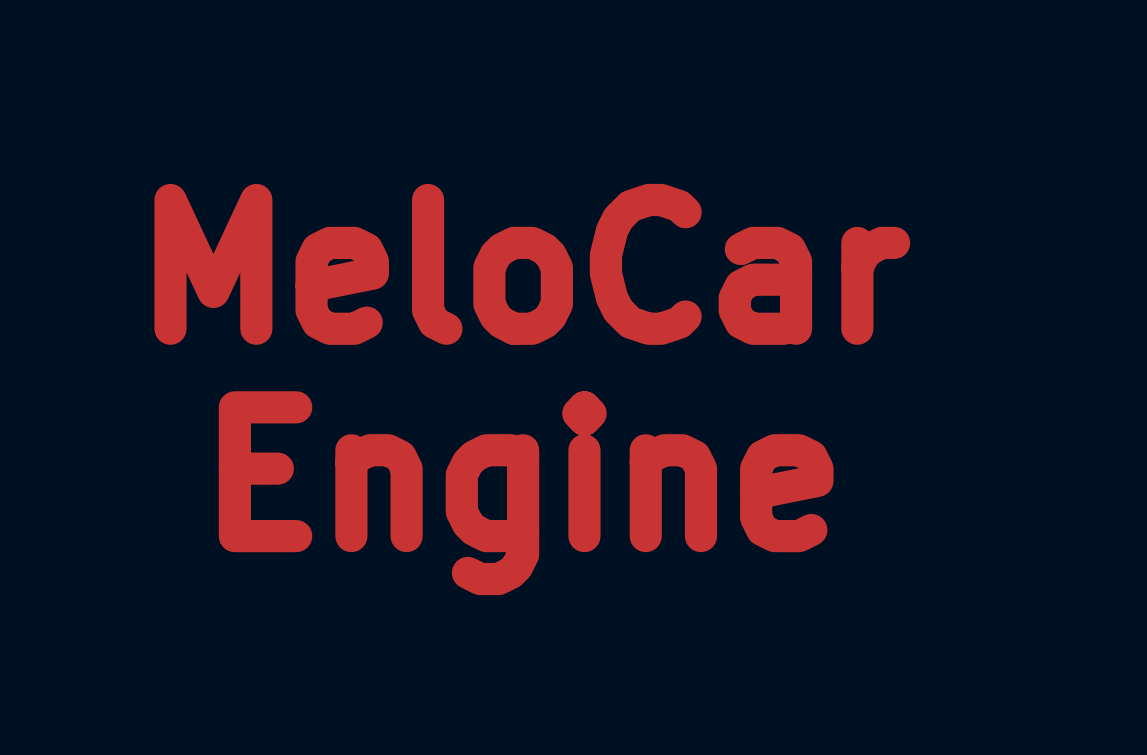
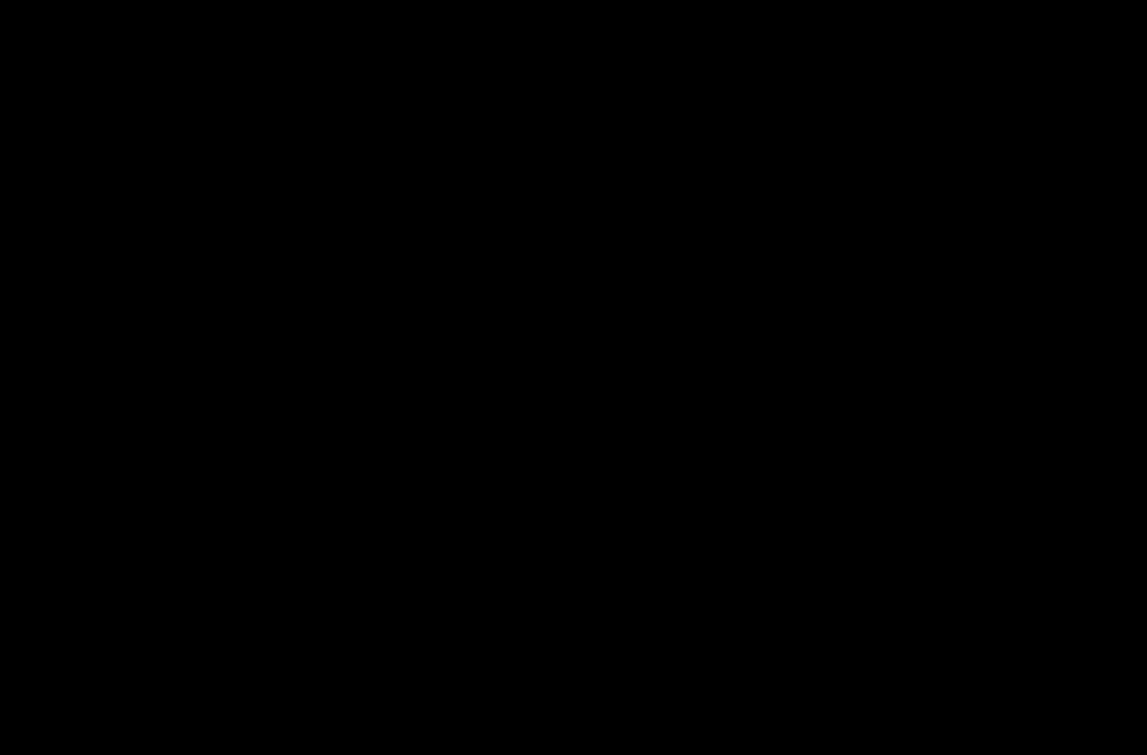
text: MeloCar (532, 264) -> none
text: Engine (526, 493) -> none

